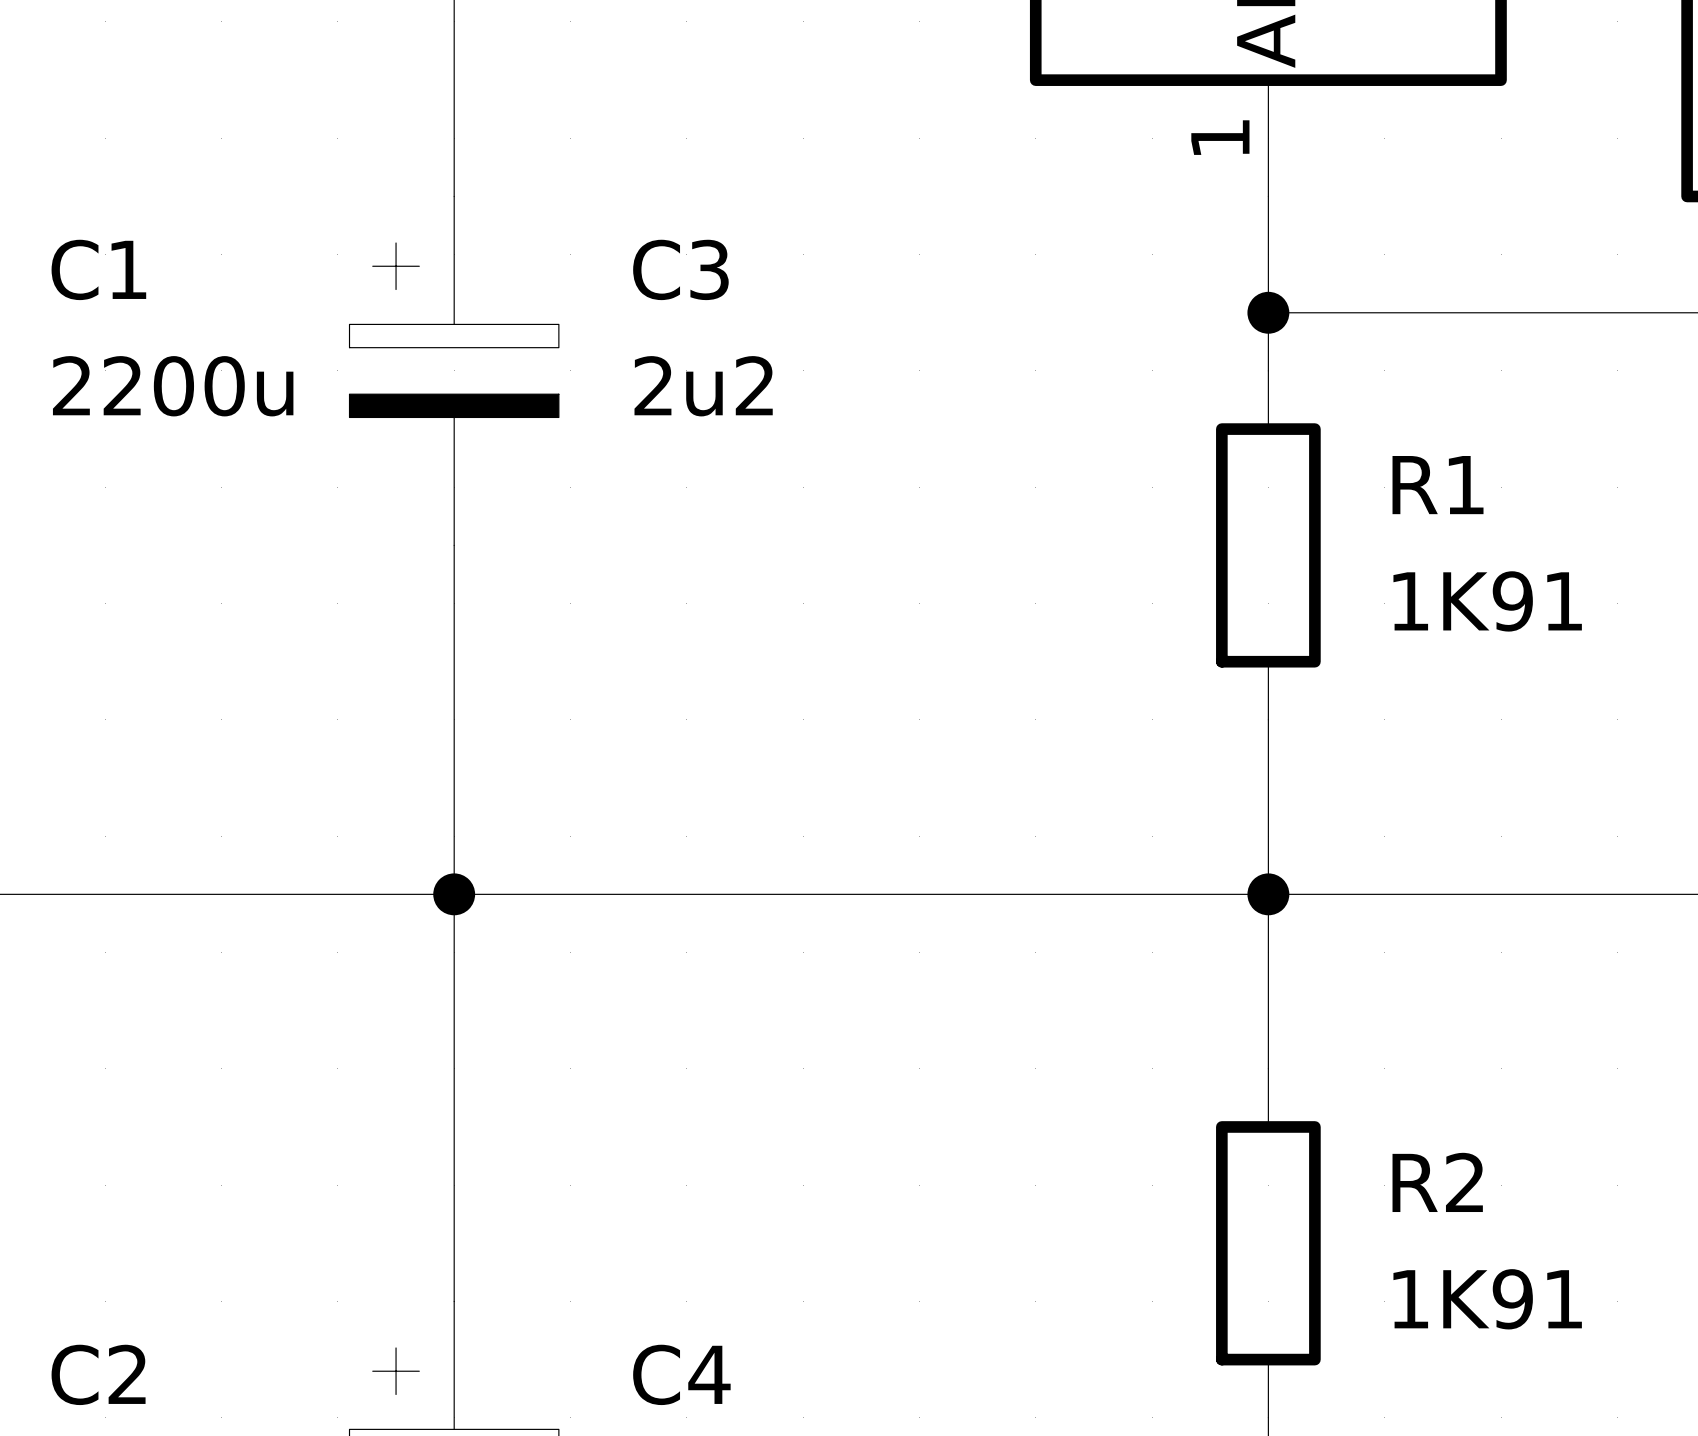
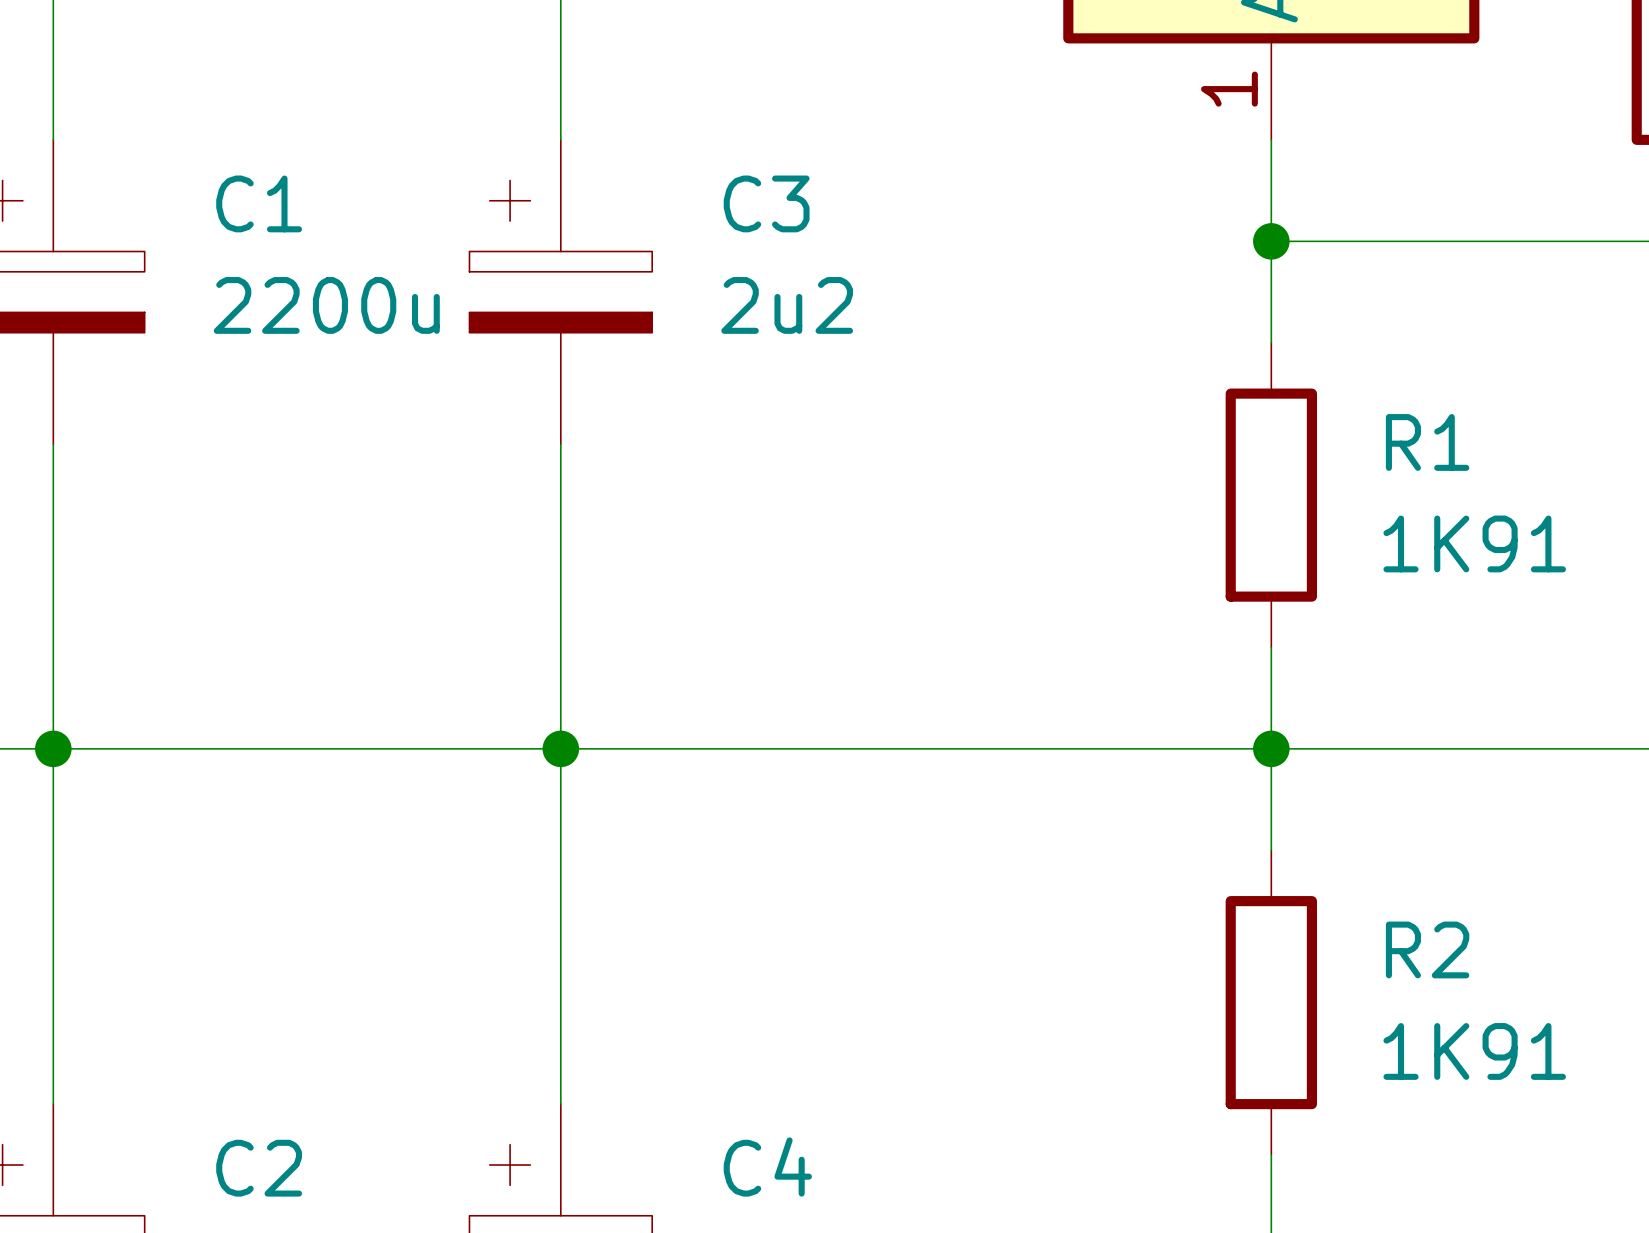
R1 position: (1268, 545) -> (1271, 495)
R2 position: (1268, 1243) -> (1271, 1002)

